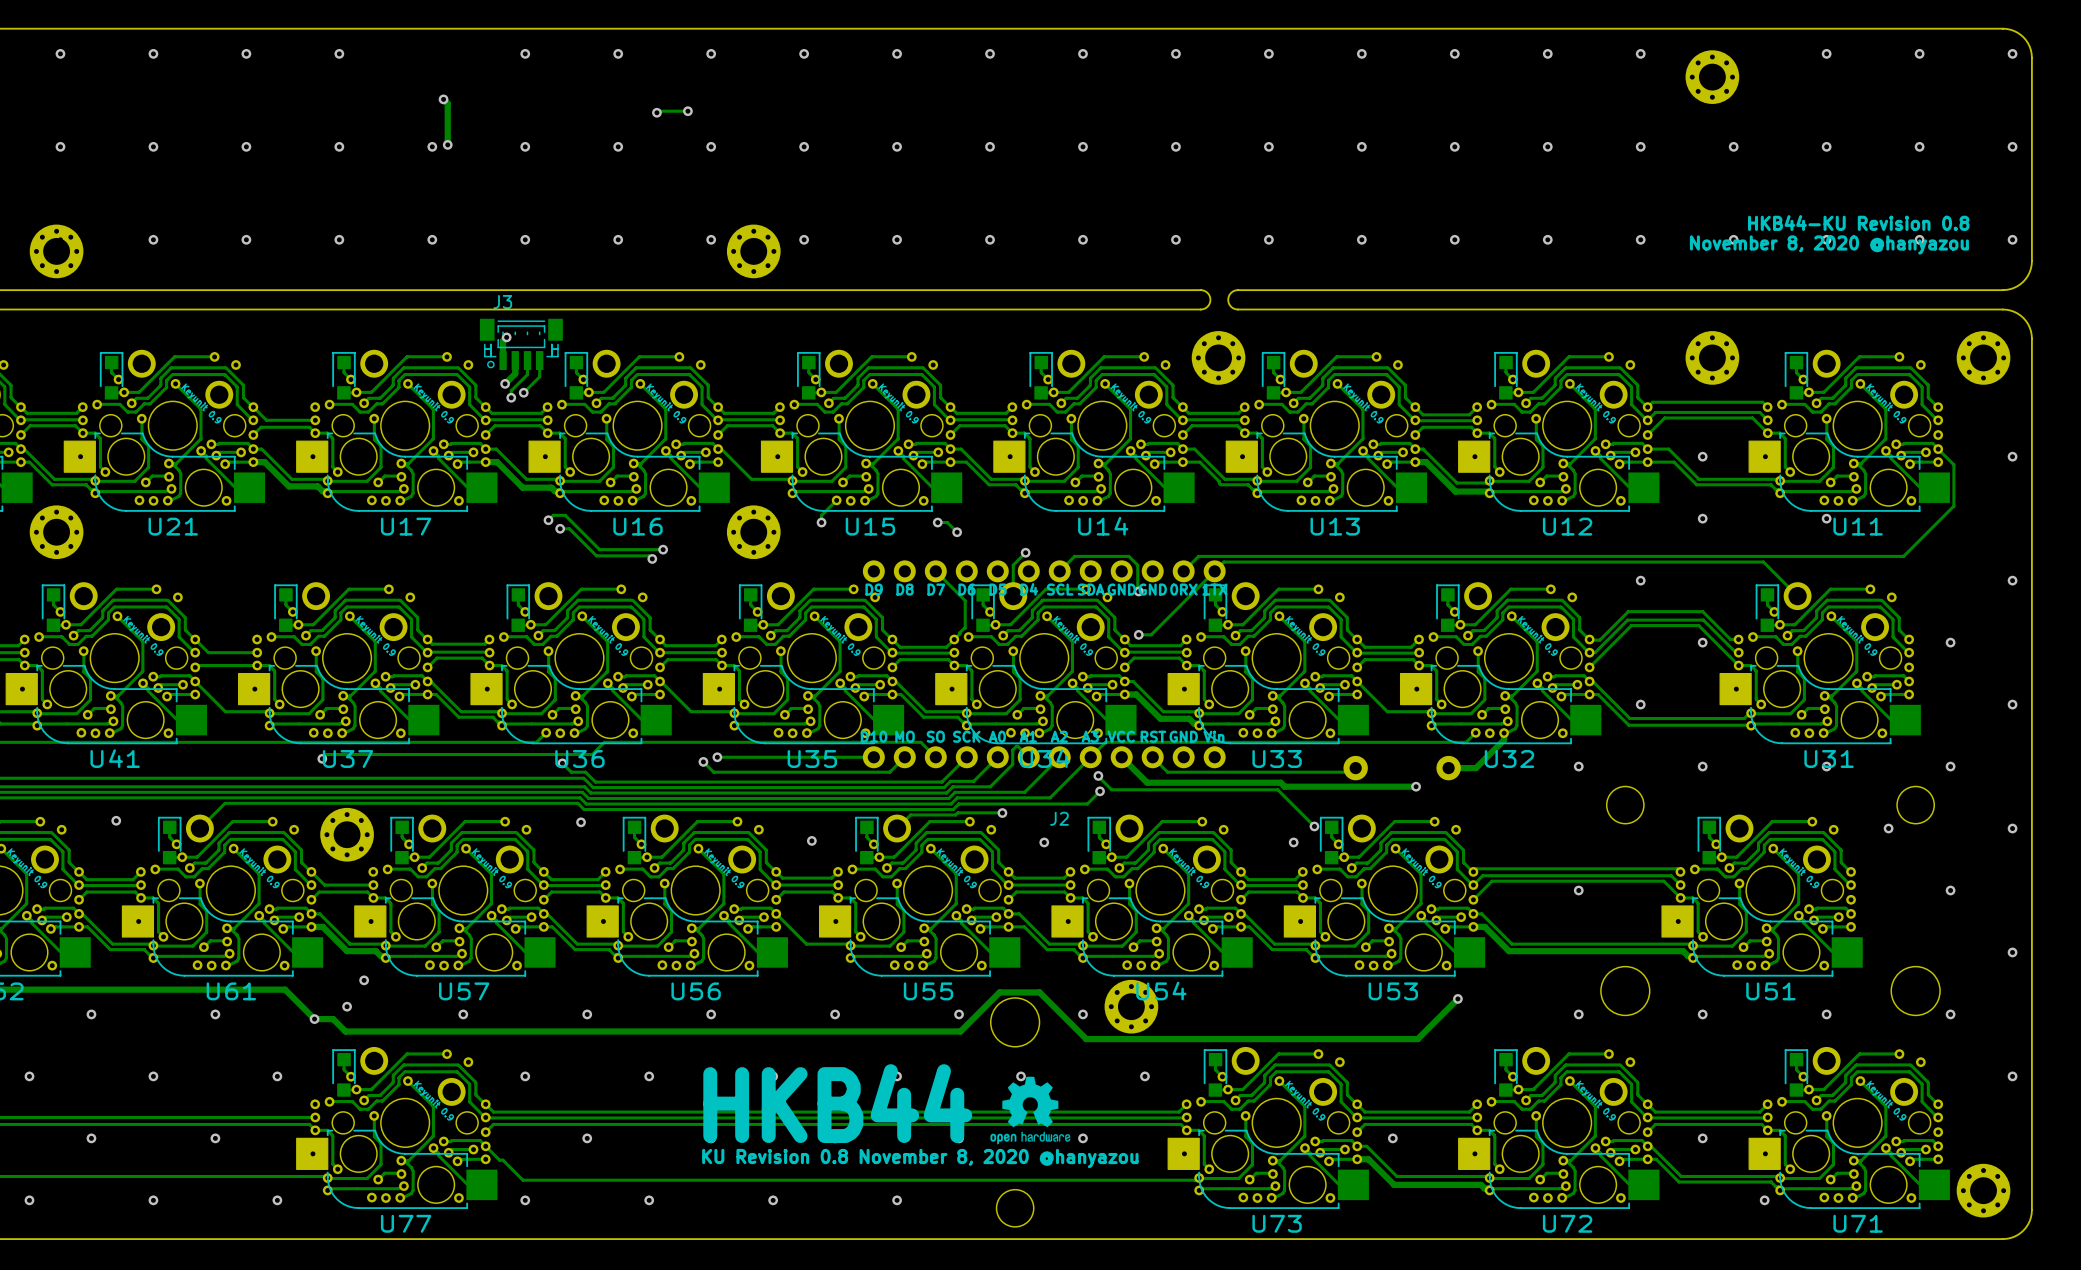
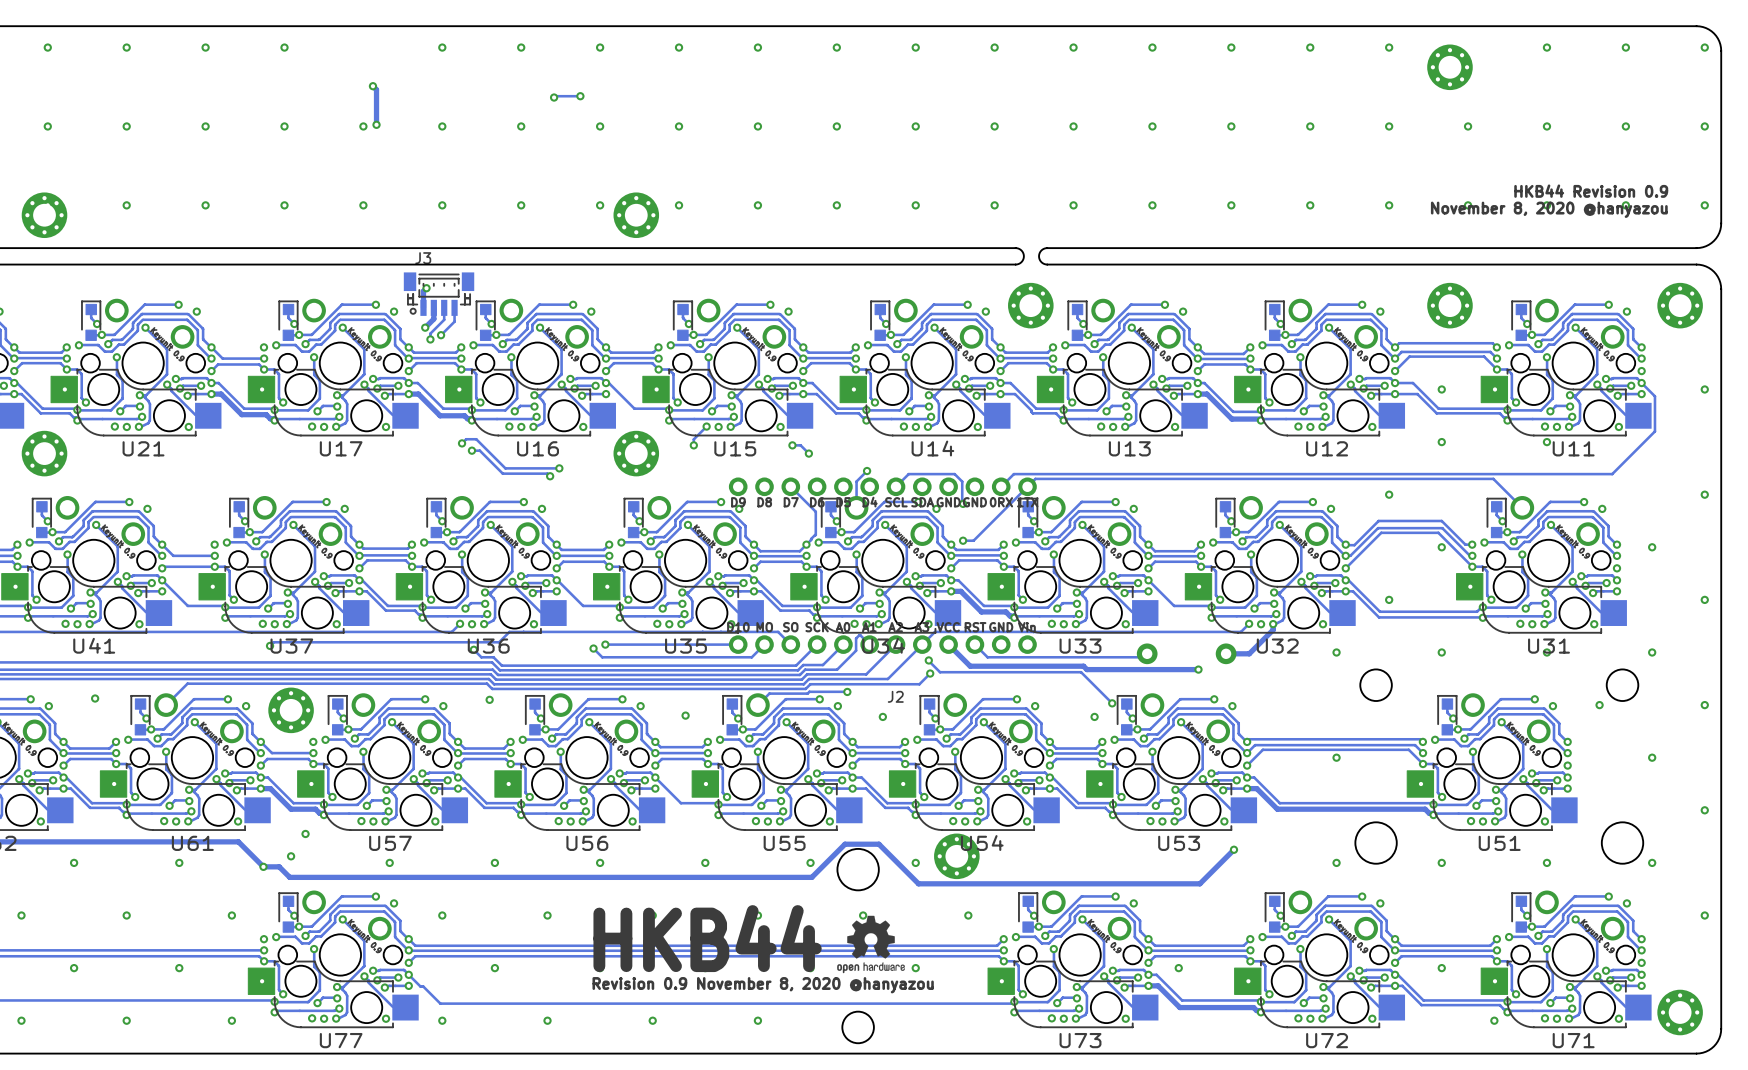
text: HKB44-KU Revision 0.8 (1858, 223) -> HKB44 Revision 0.9 (1591, 191)
text: KU Revision 0.8 November 8, 2020 @hanyazou (920, 1158) -> Revision 0.9 November 8, 2020 @hanyazou (763, 985)

